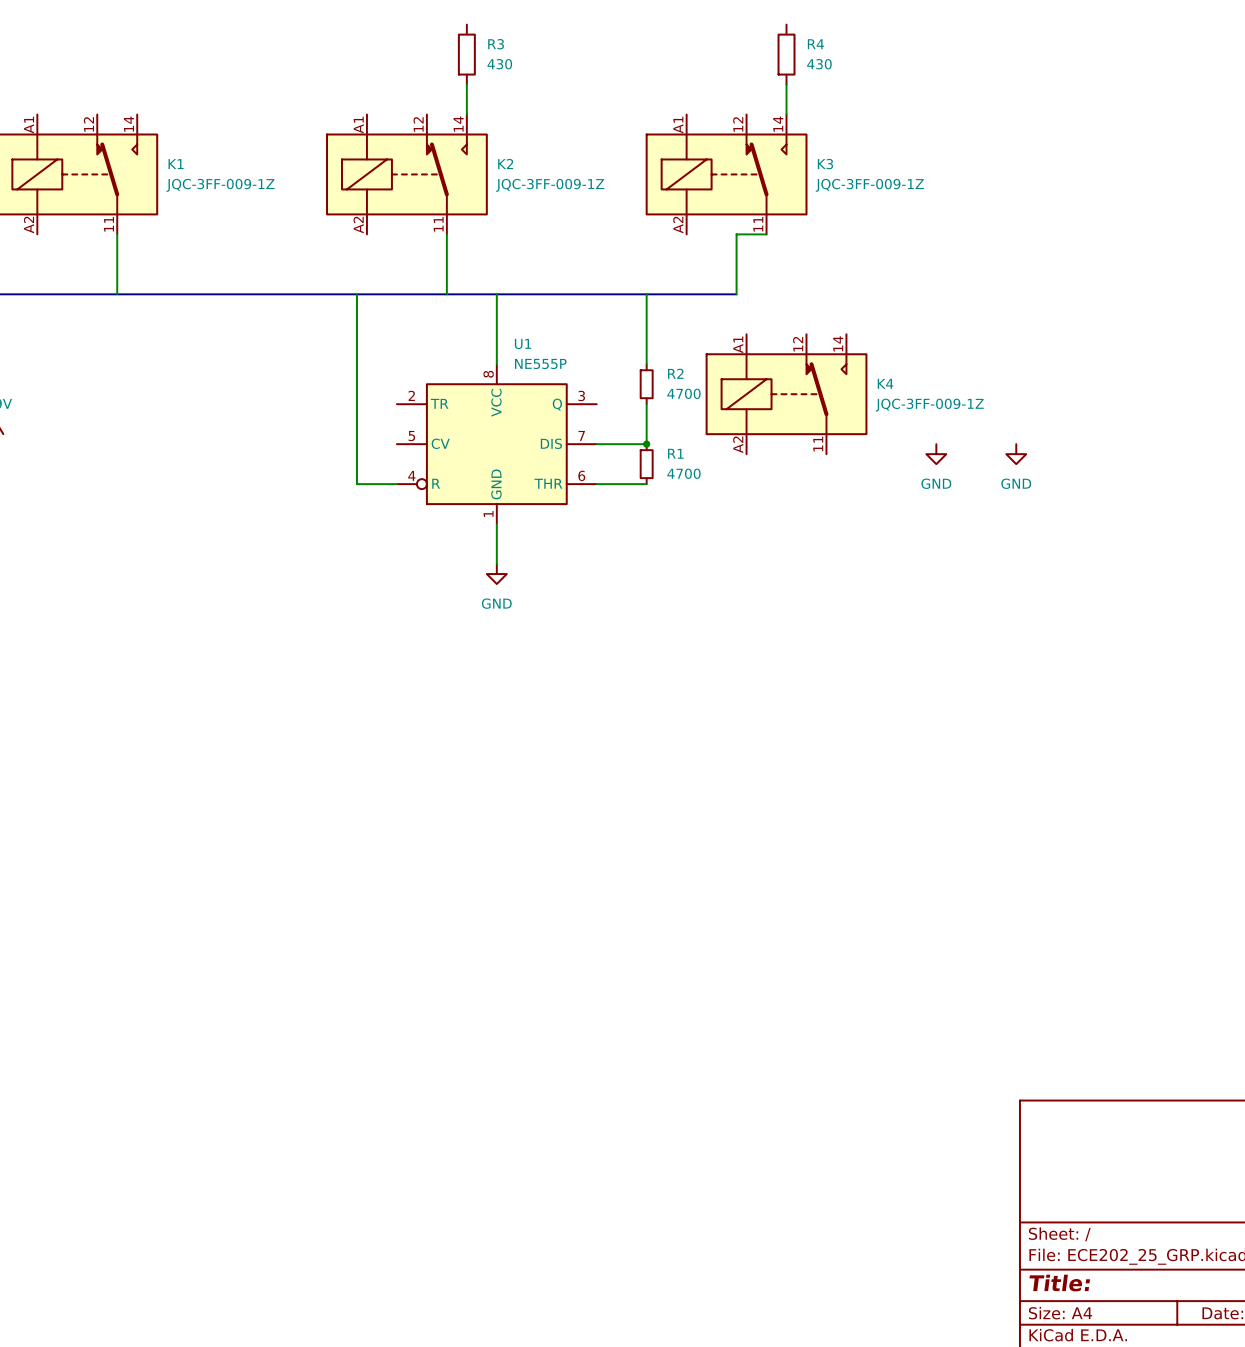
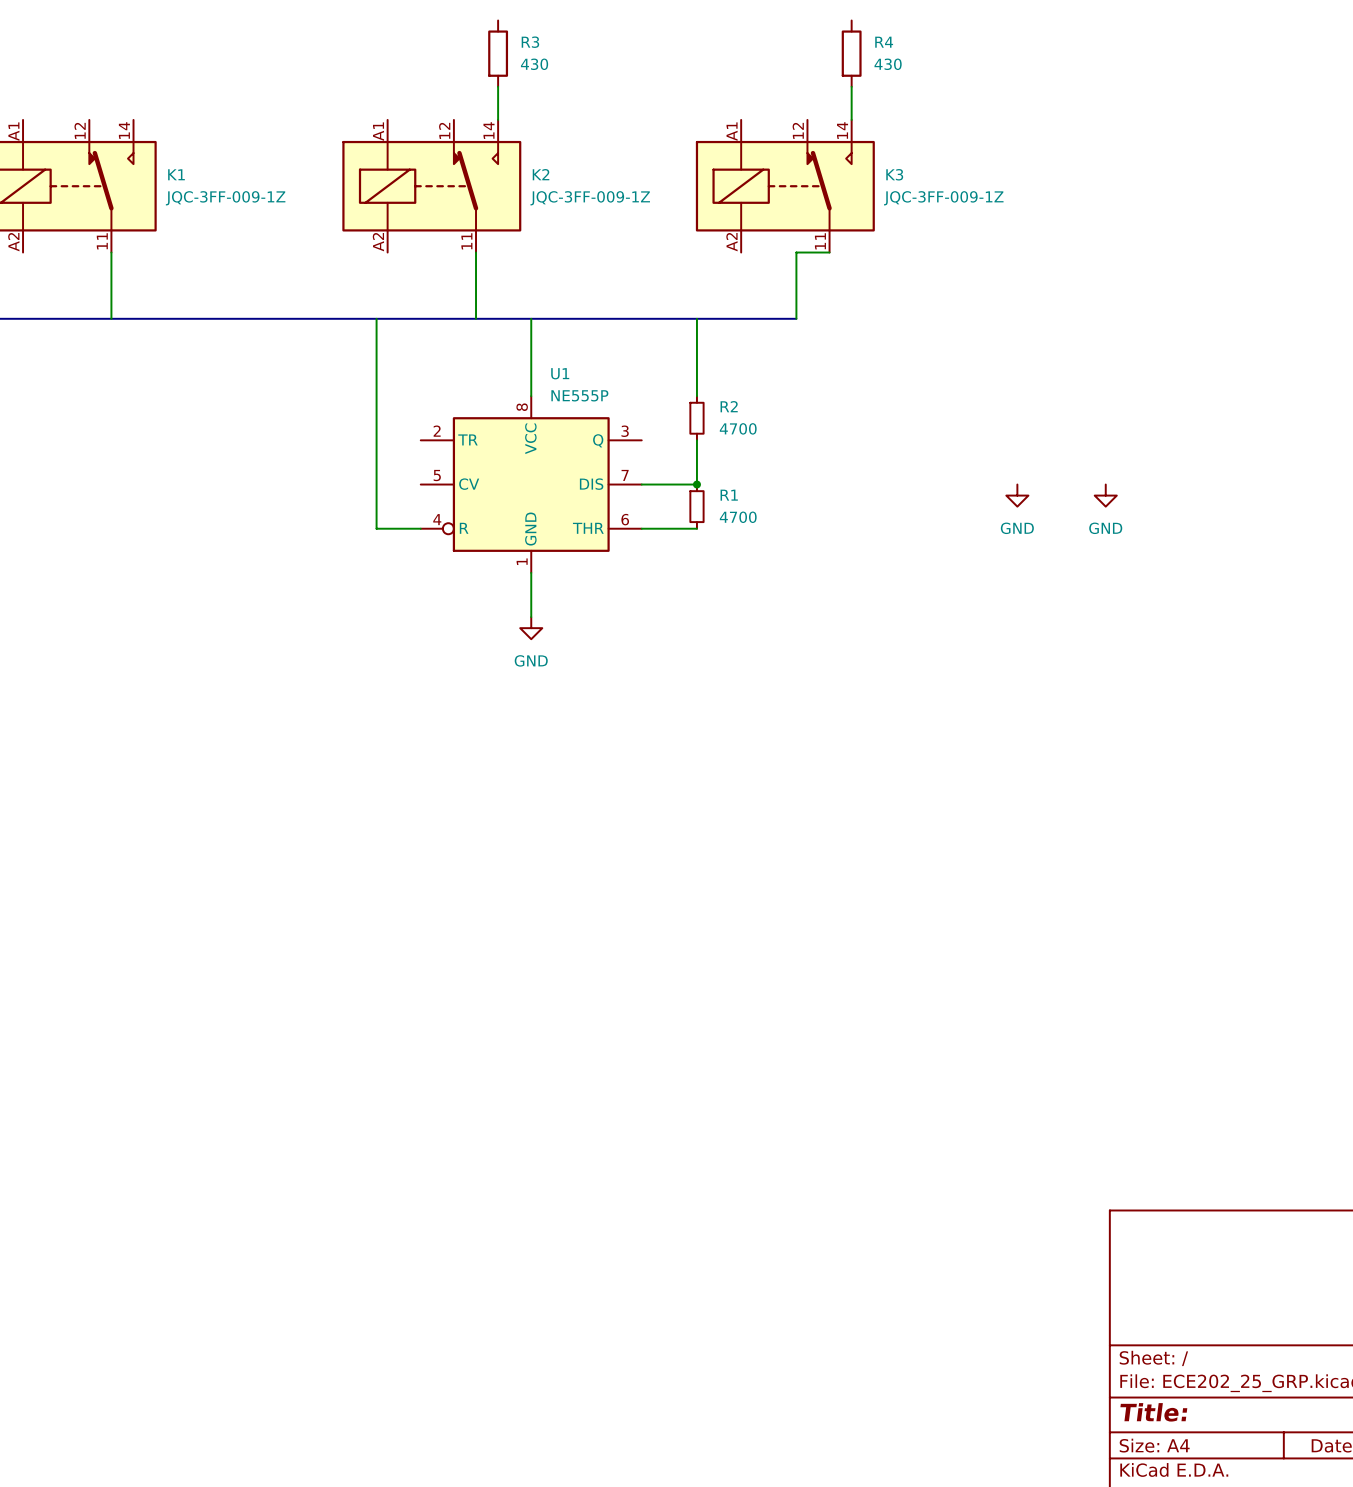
K4: JQC-3FF-009-1Z (786, 394) -> none

